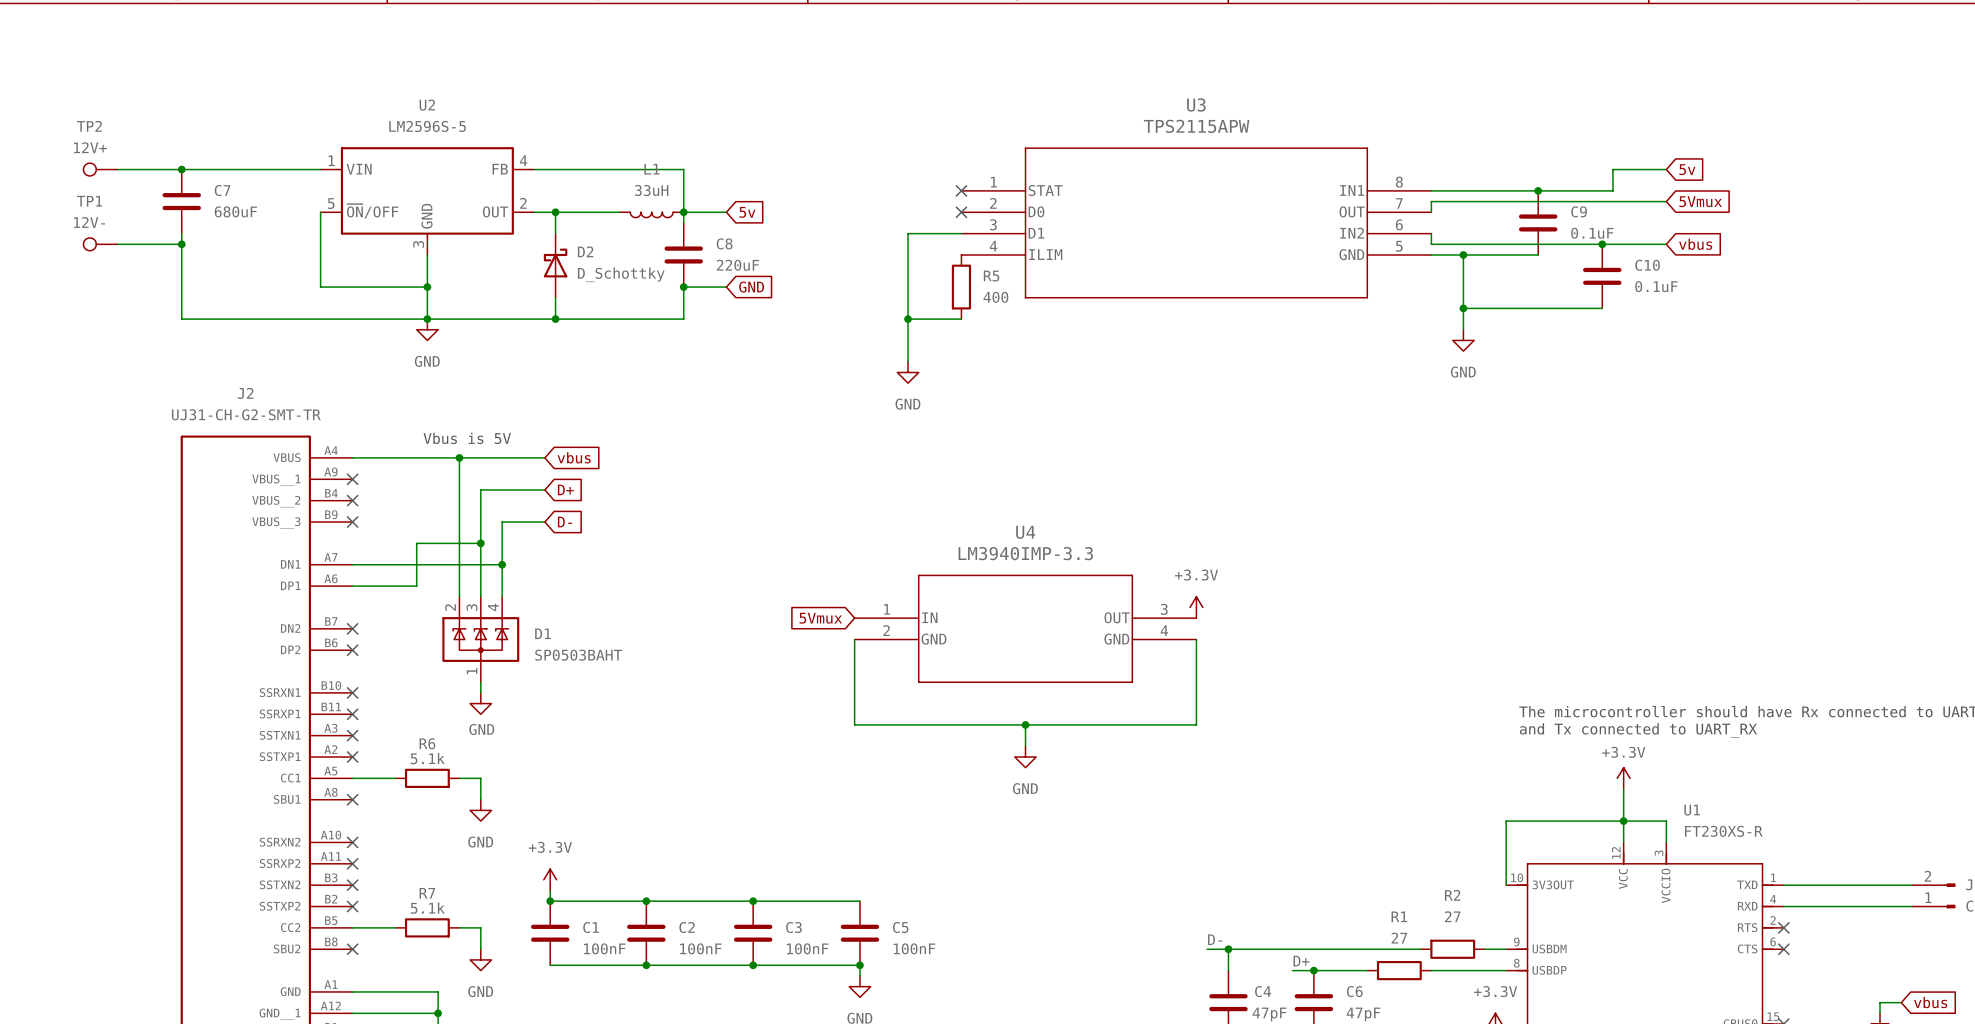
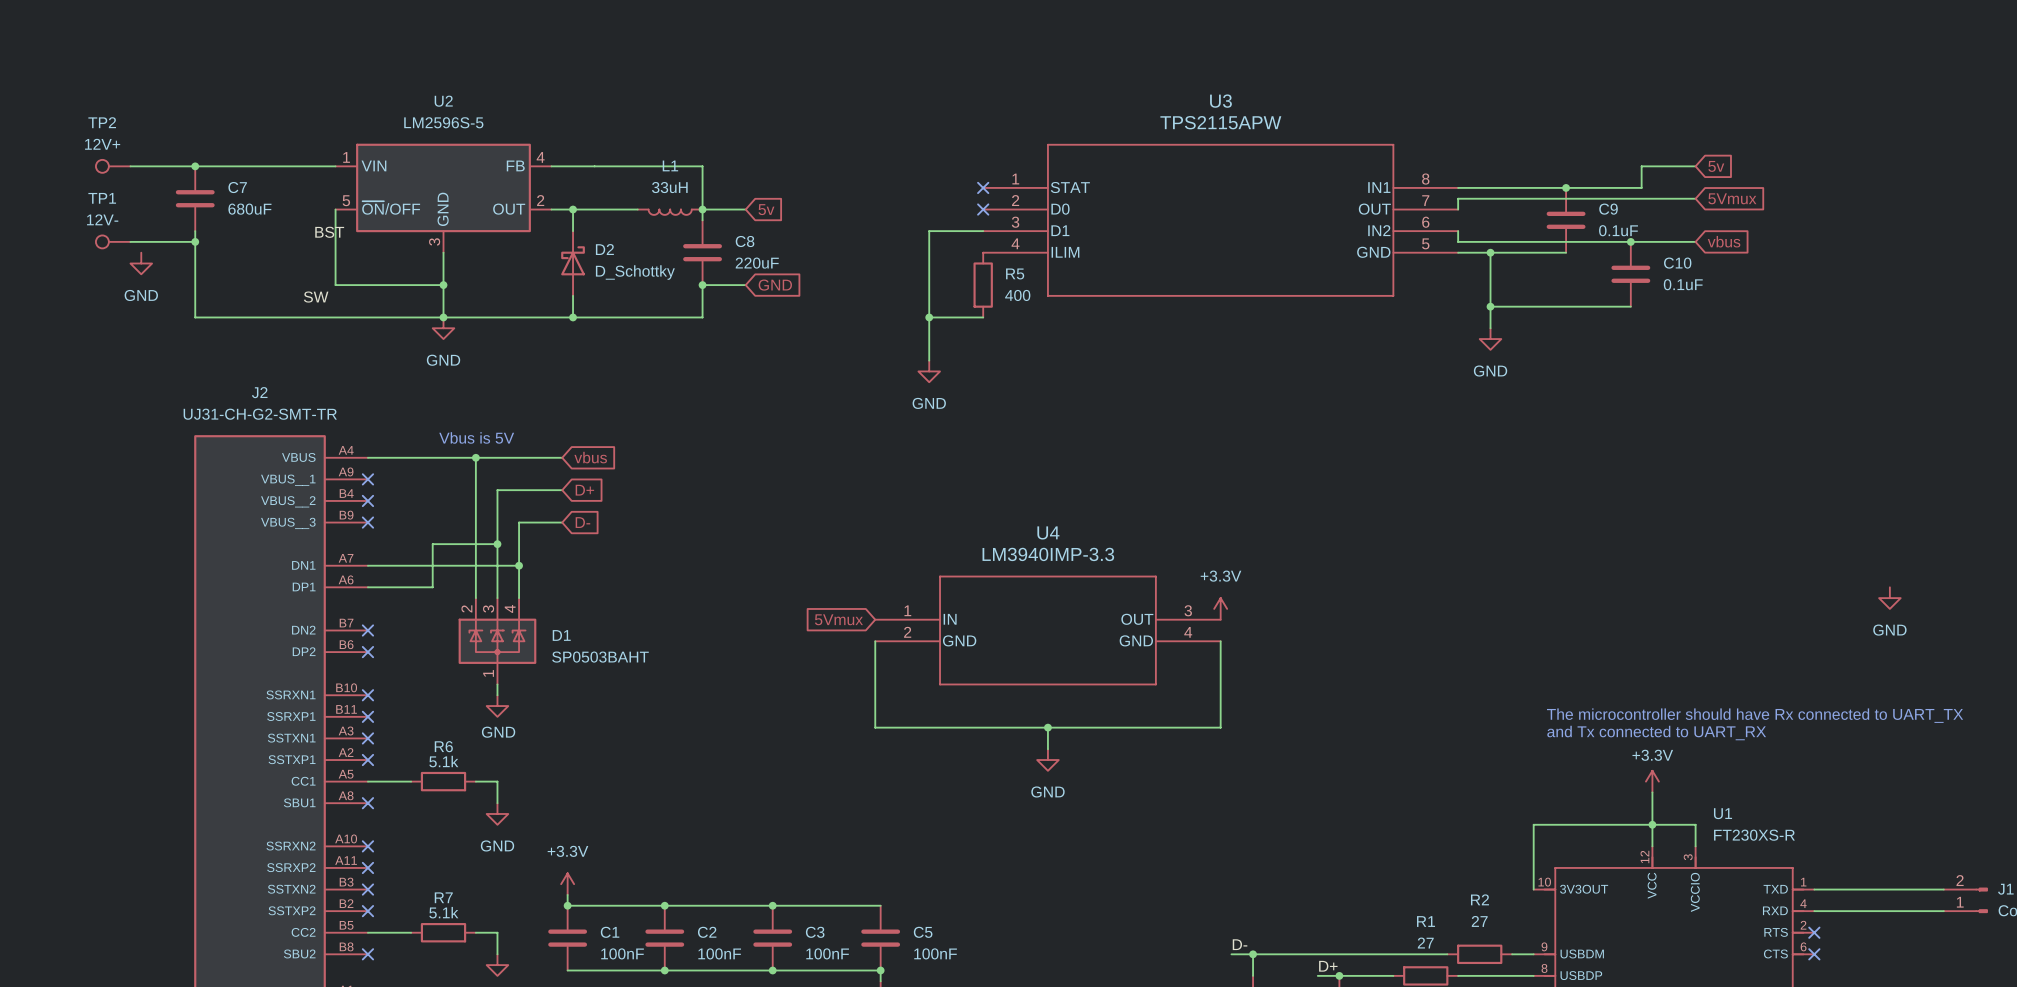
label: none -> BST (329, 232)
power symbol: none -> GND (141, 263)
label: none -> SW (316, 297)
power symbol: none -> GND (1889, 598)

